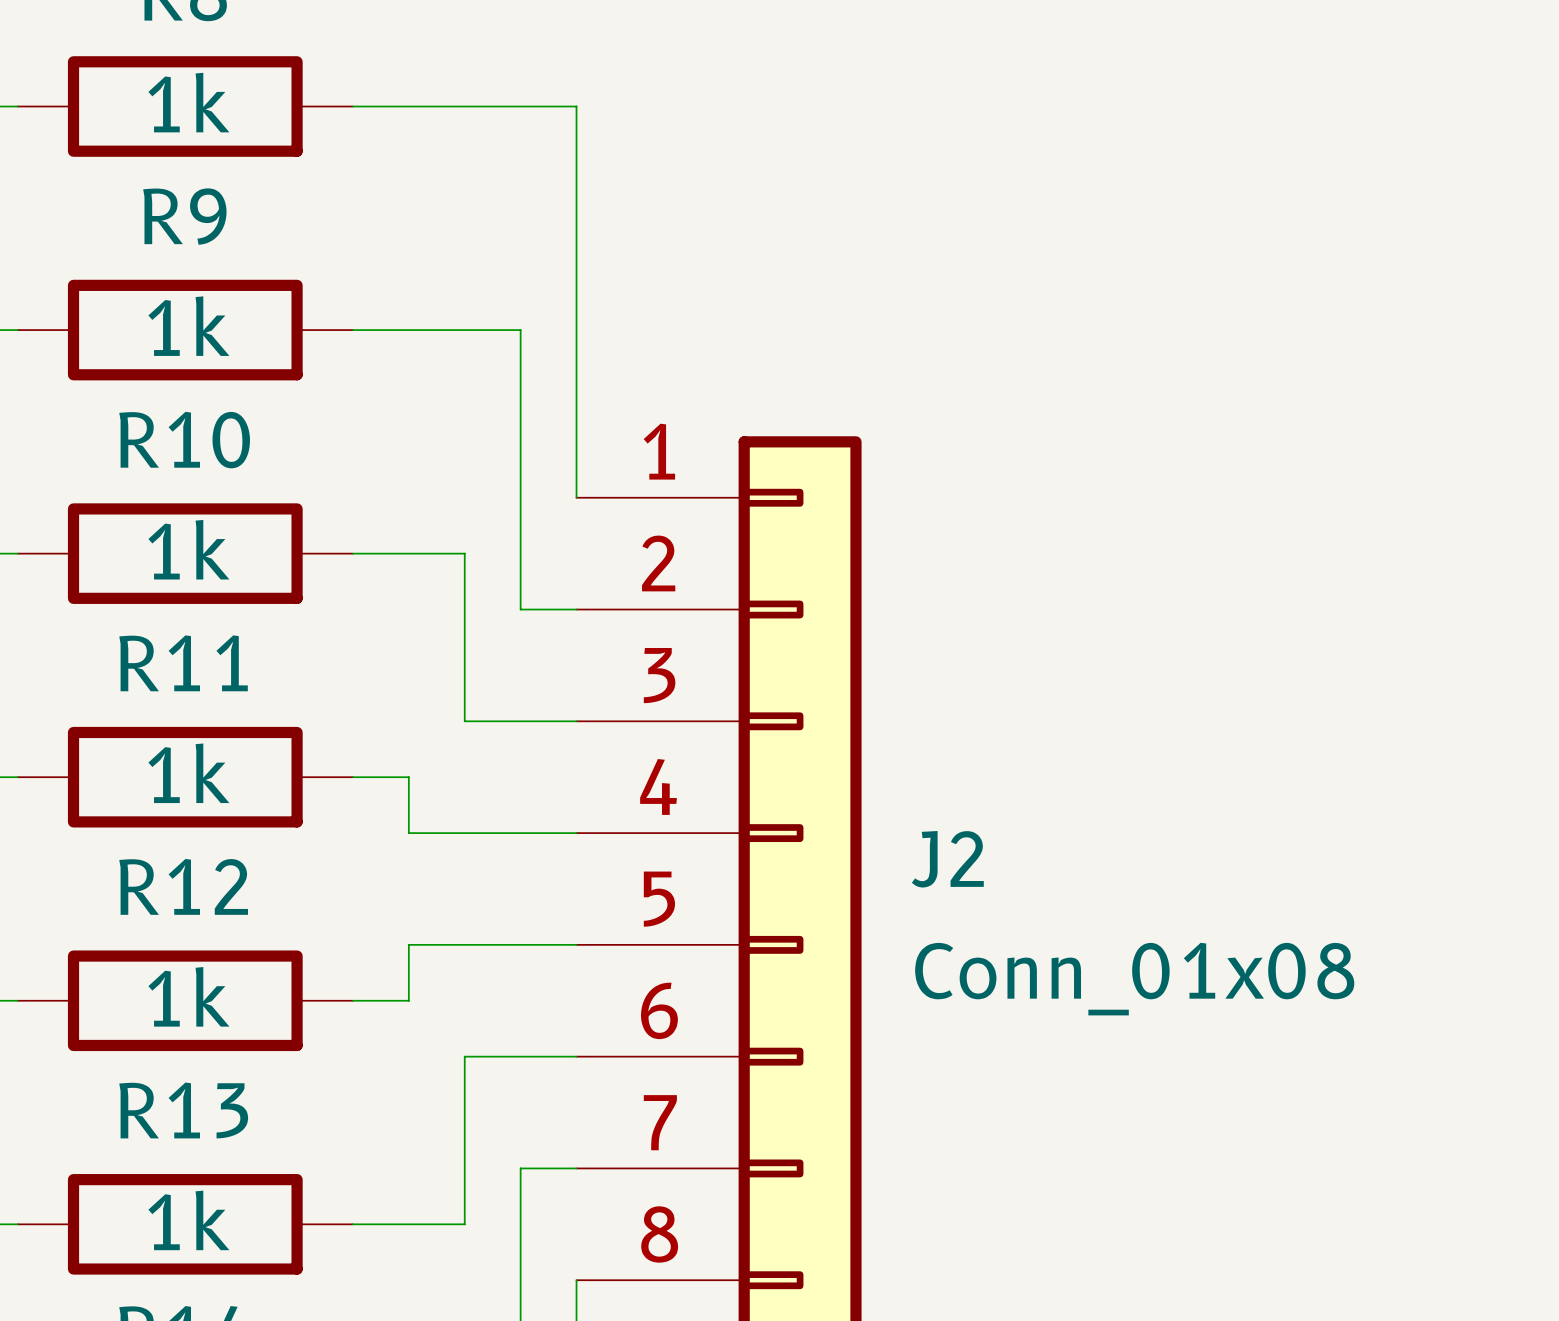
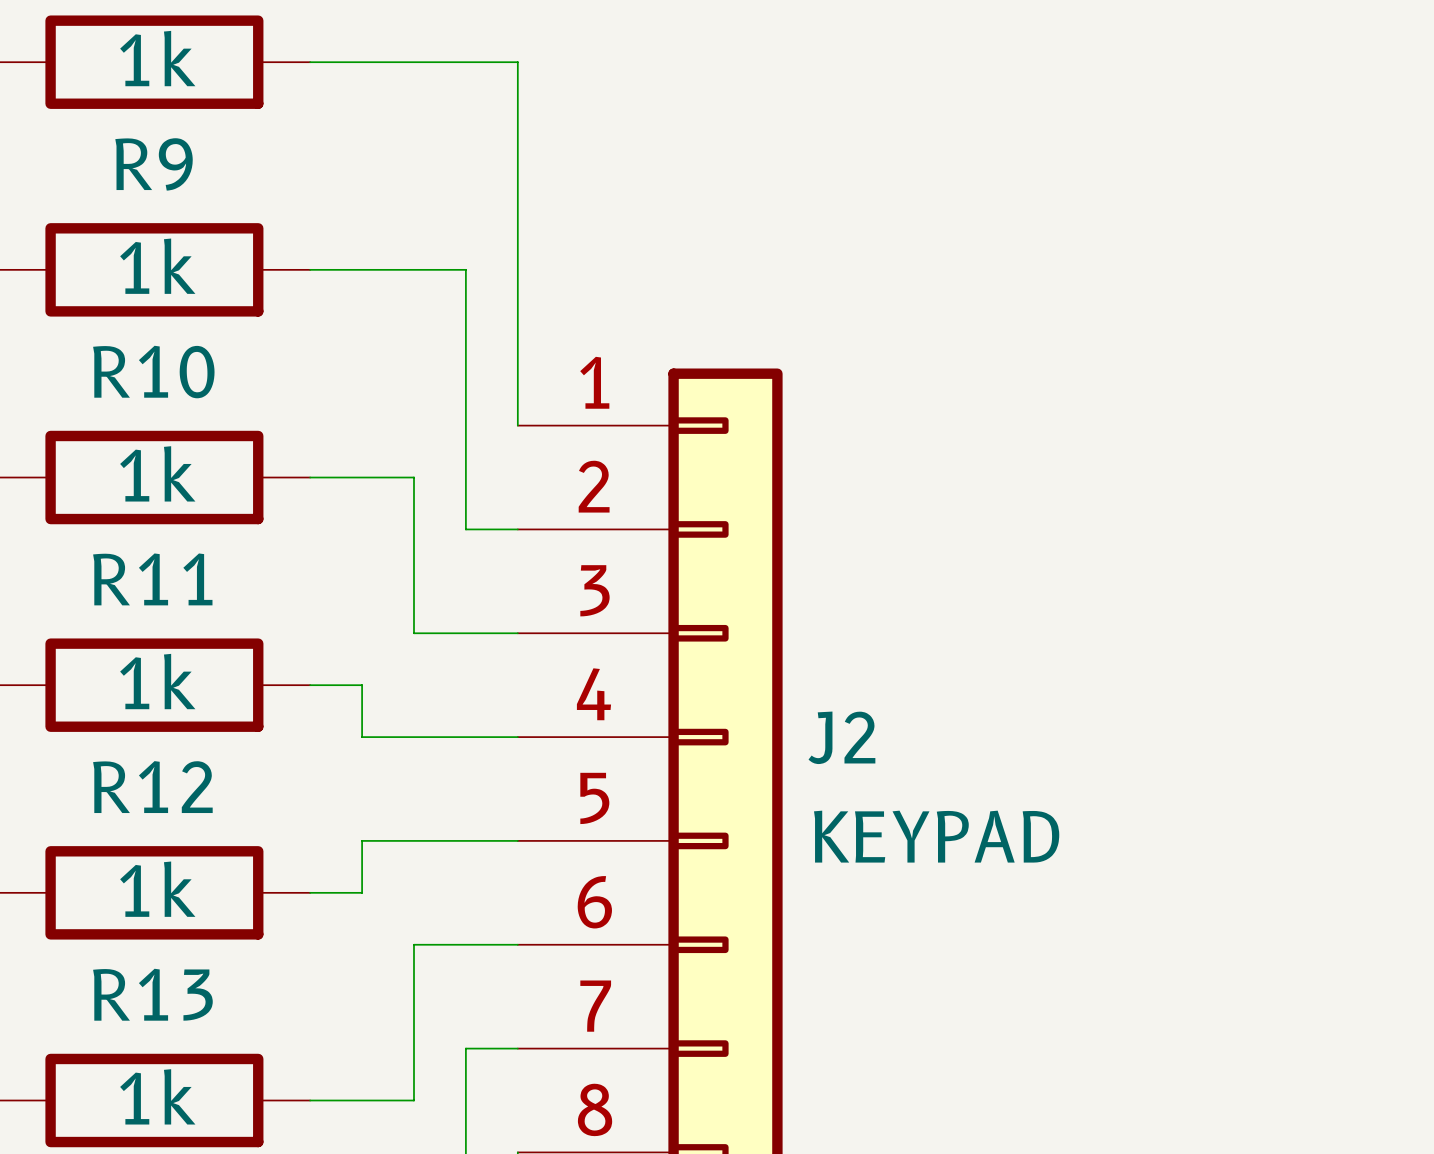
J2 name position: J2 (947, 859) -> J2 (841, 737)
J2 value: Conn_01x08 (1134, 979) -> KEYPAD (936, 836)

